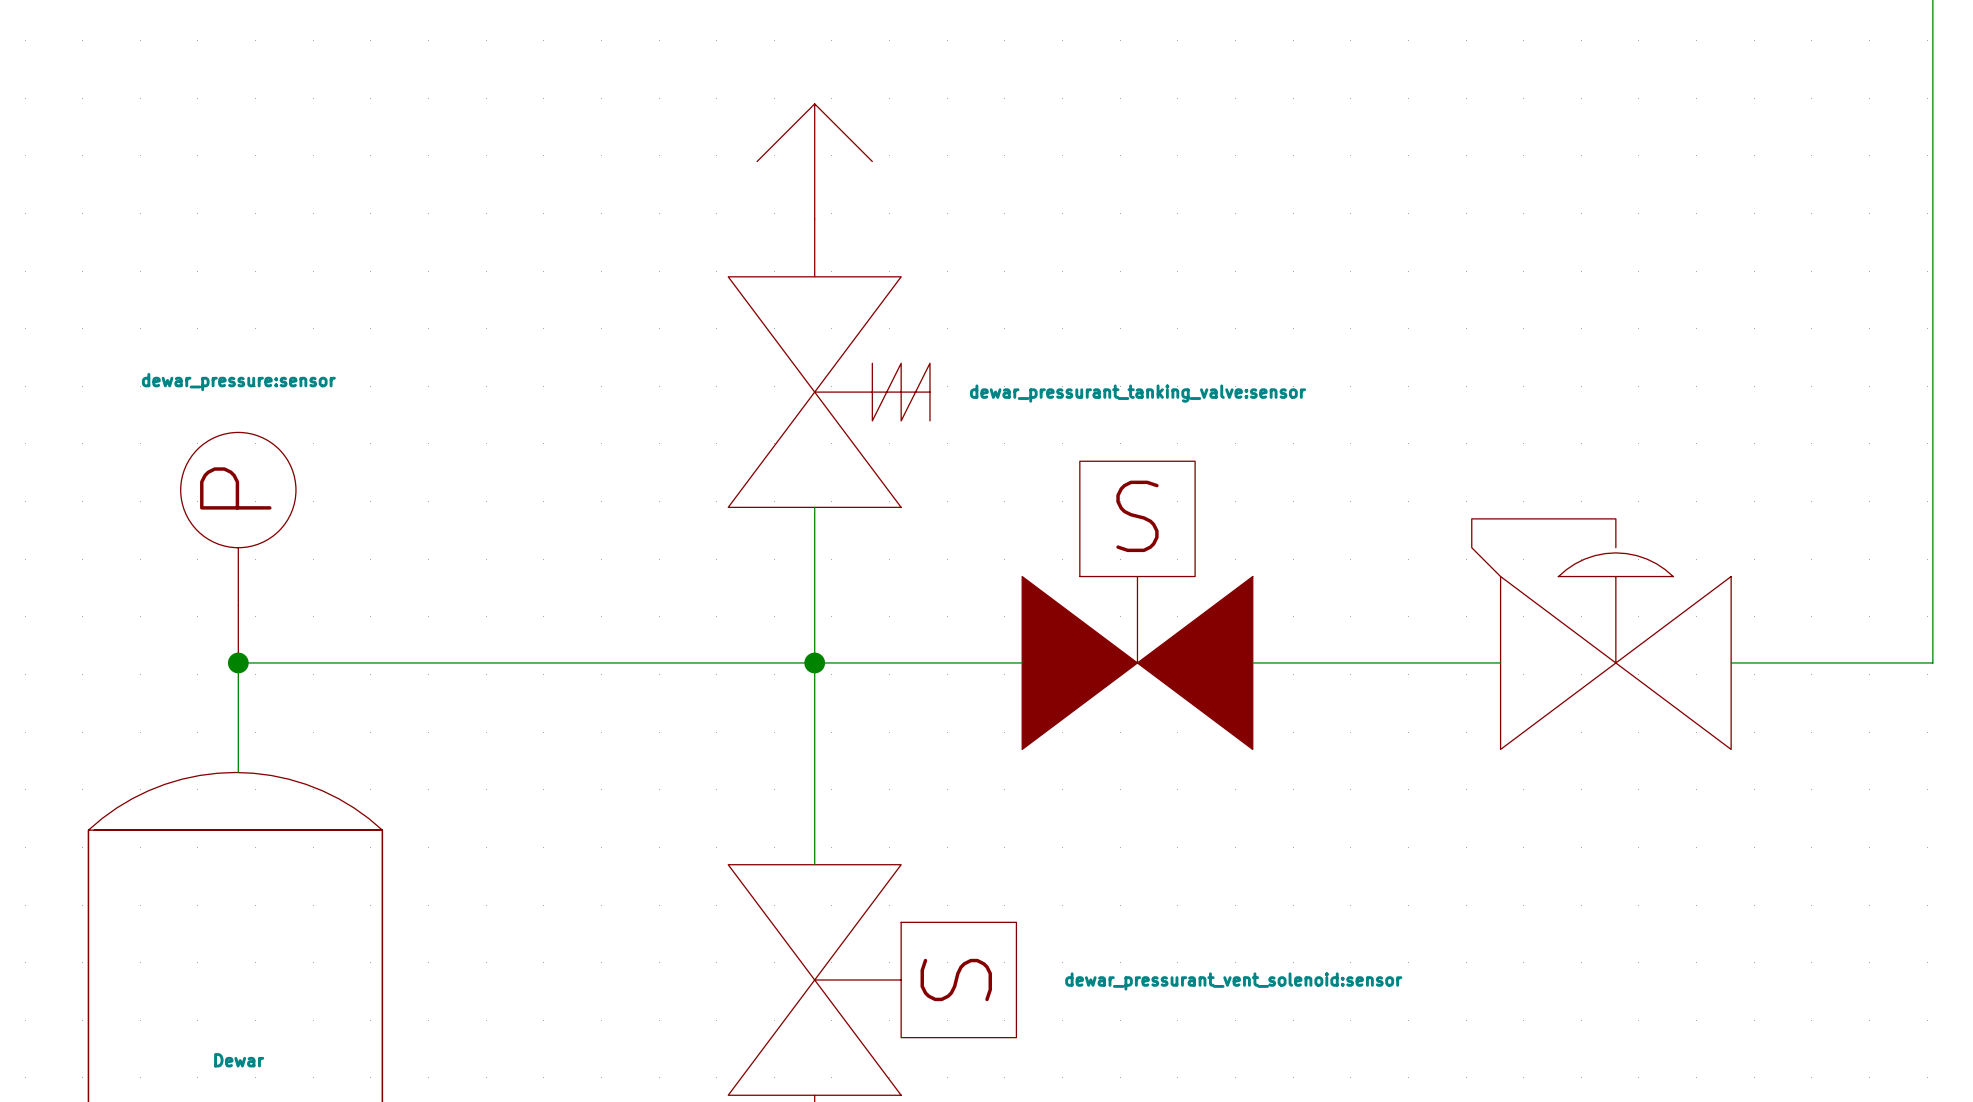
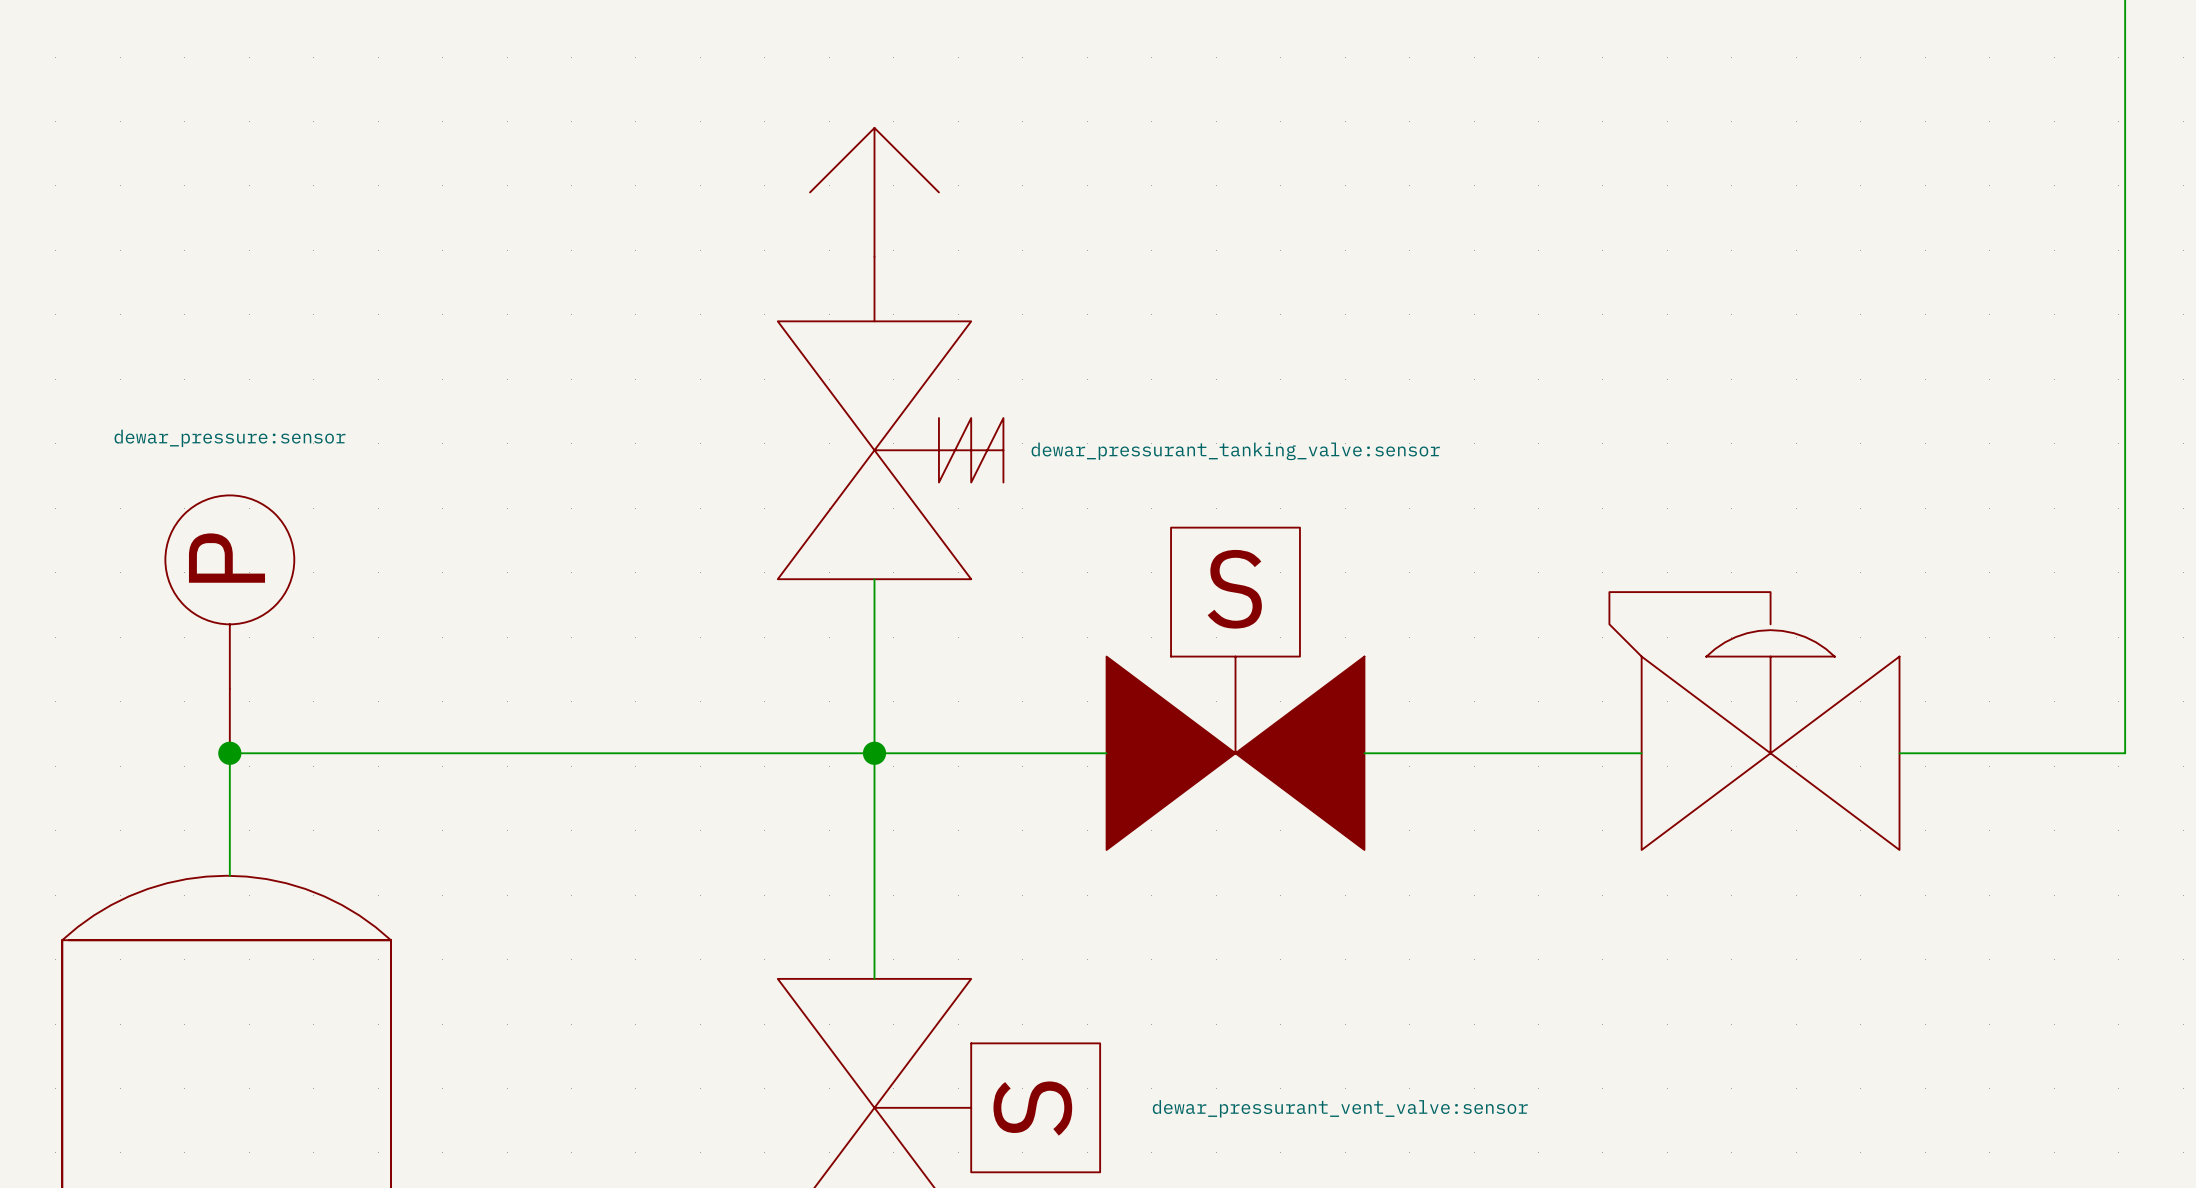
part value: dewar_pressurant_vent_solenoid:sensor (1233, 981) -> dewar_pressurant_vent_valve:sensor (1340, 1108)

